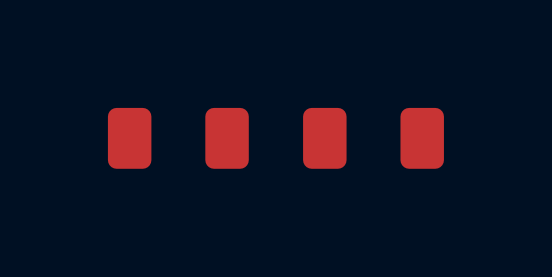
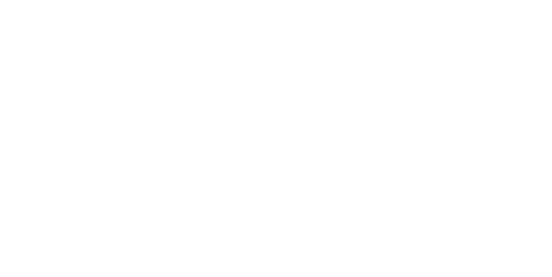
part: (178, 138) -> none
part: (373, 138) -> none

